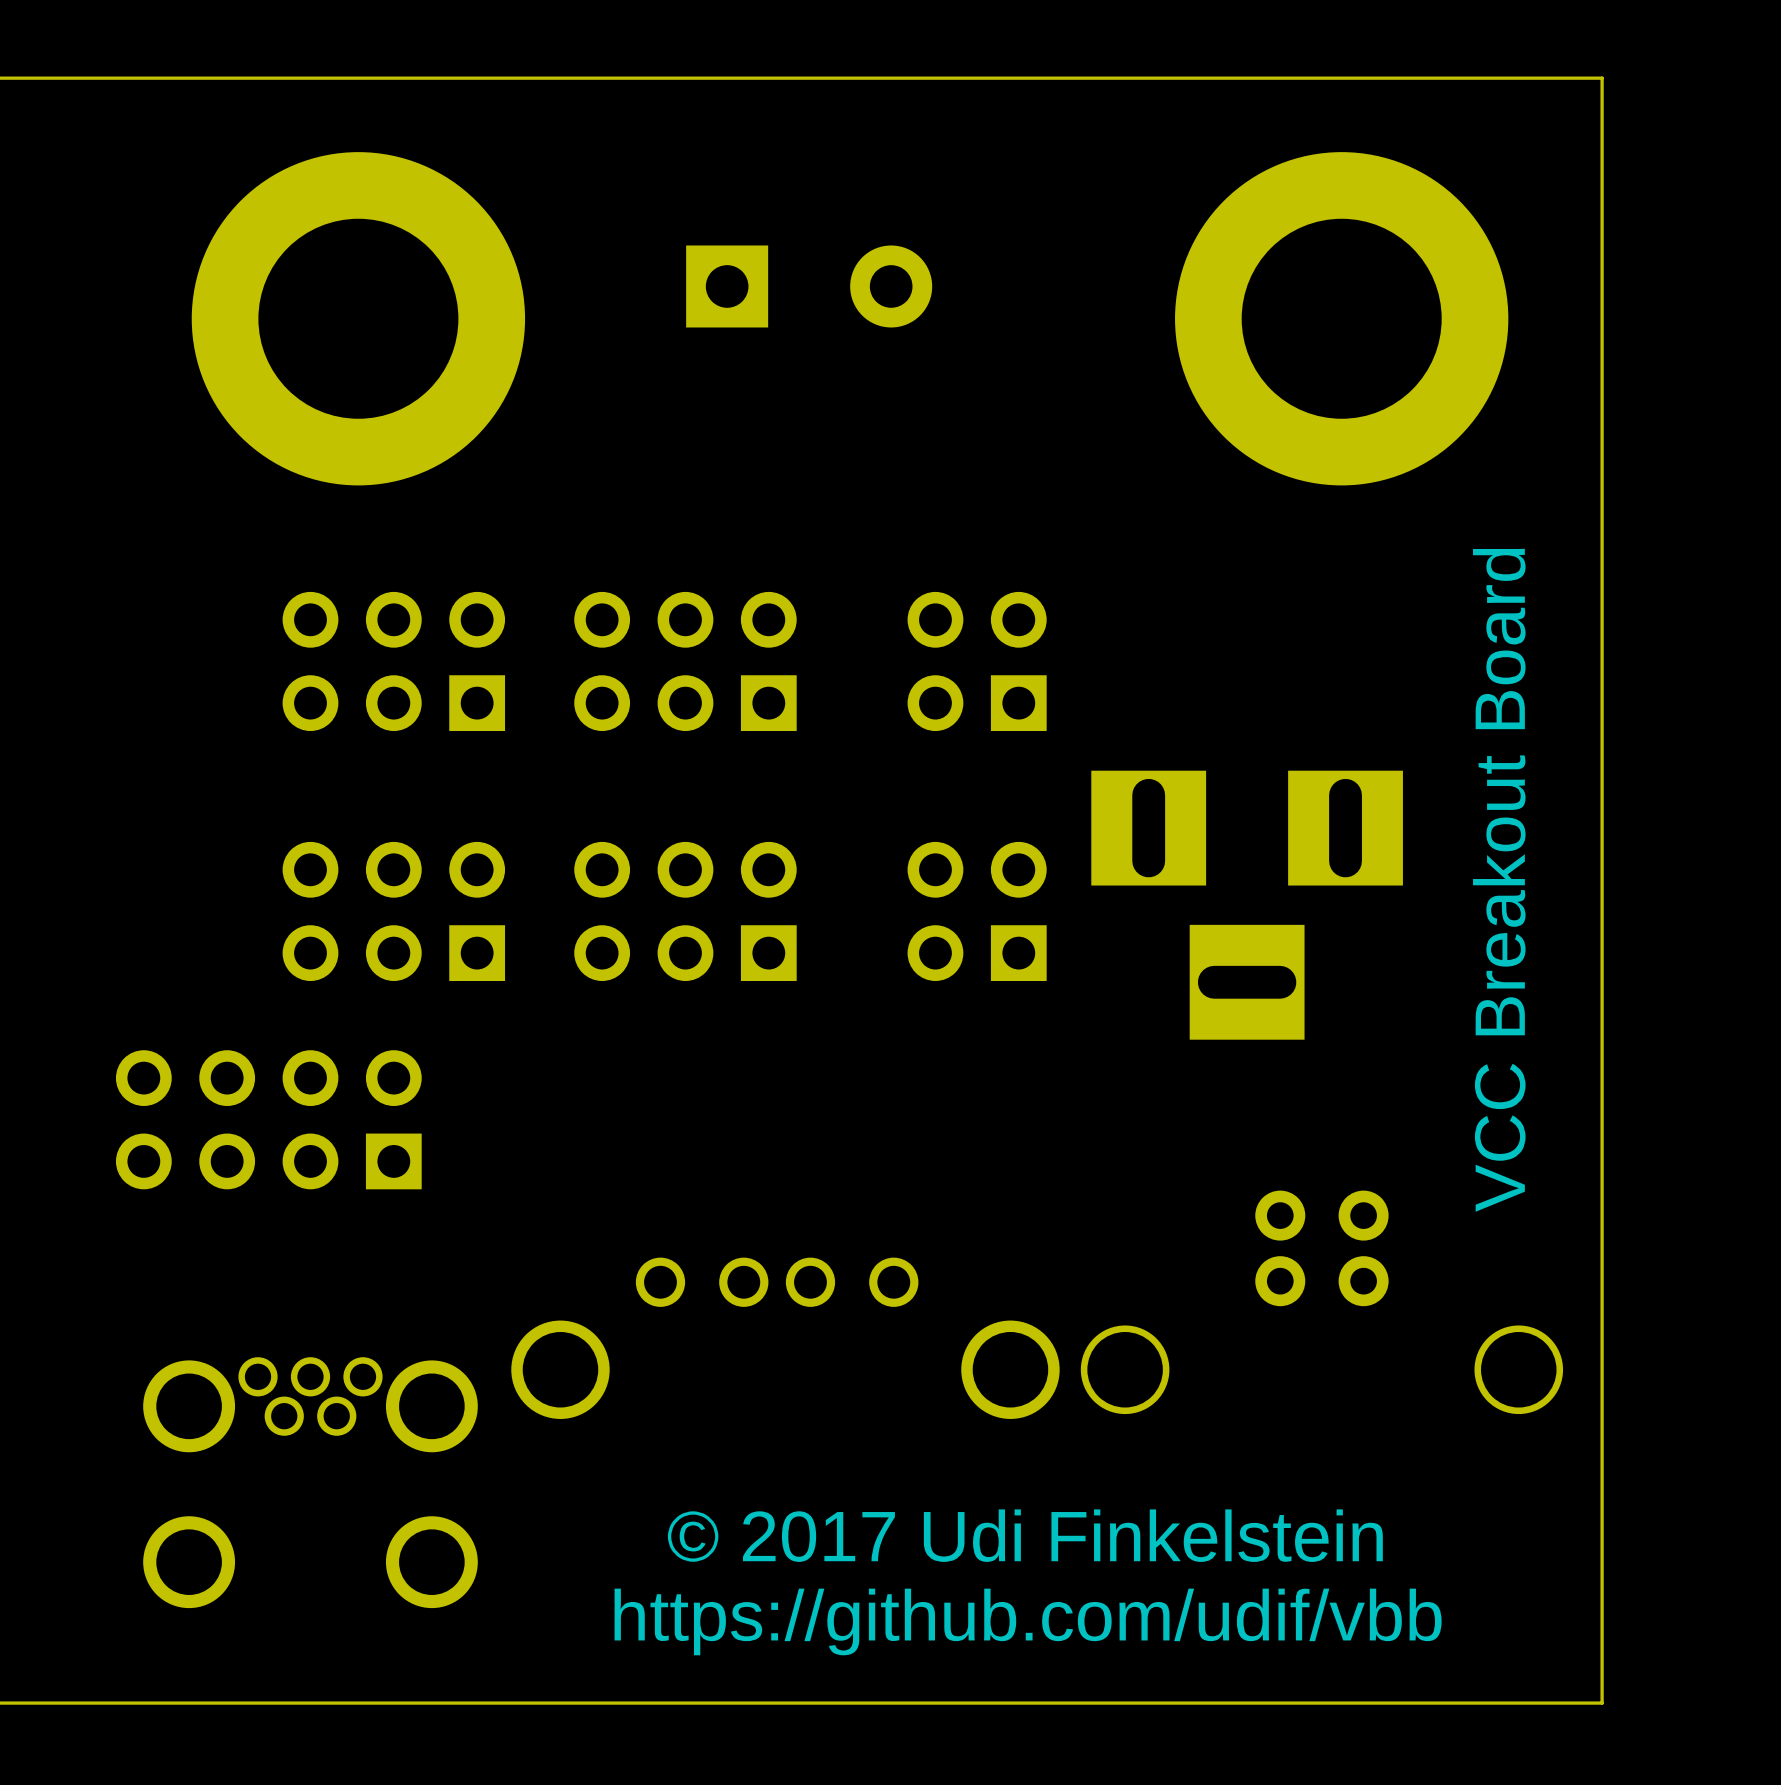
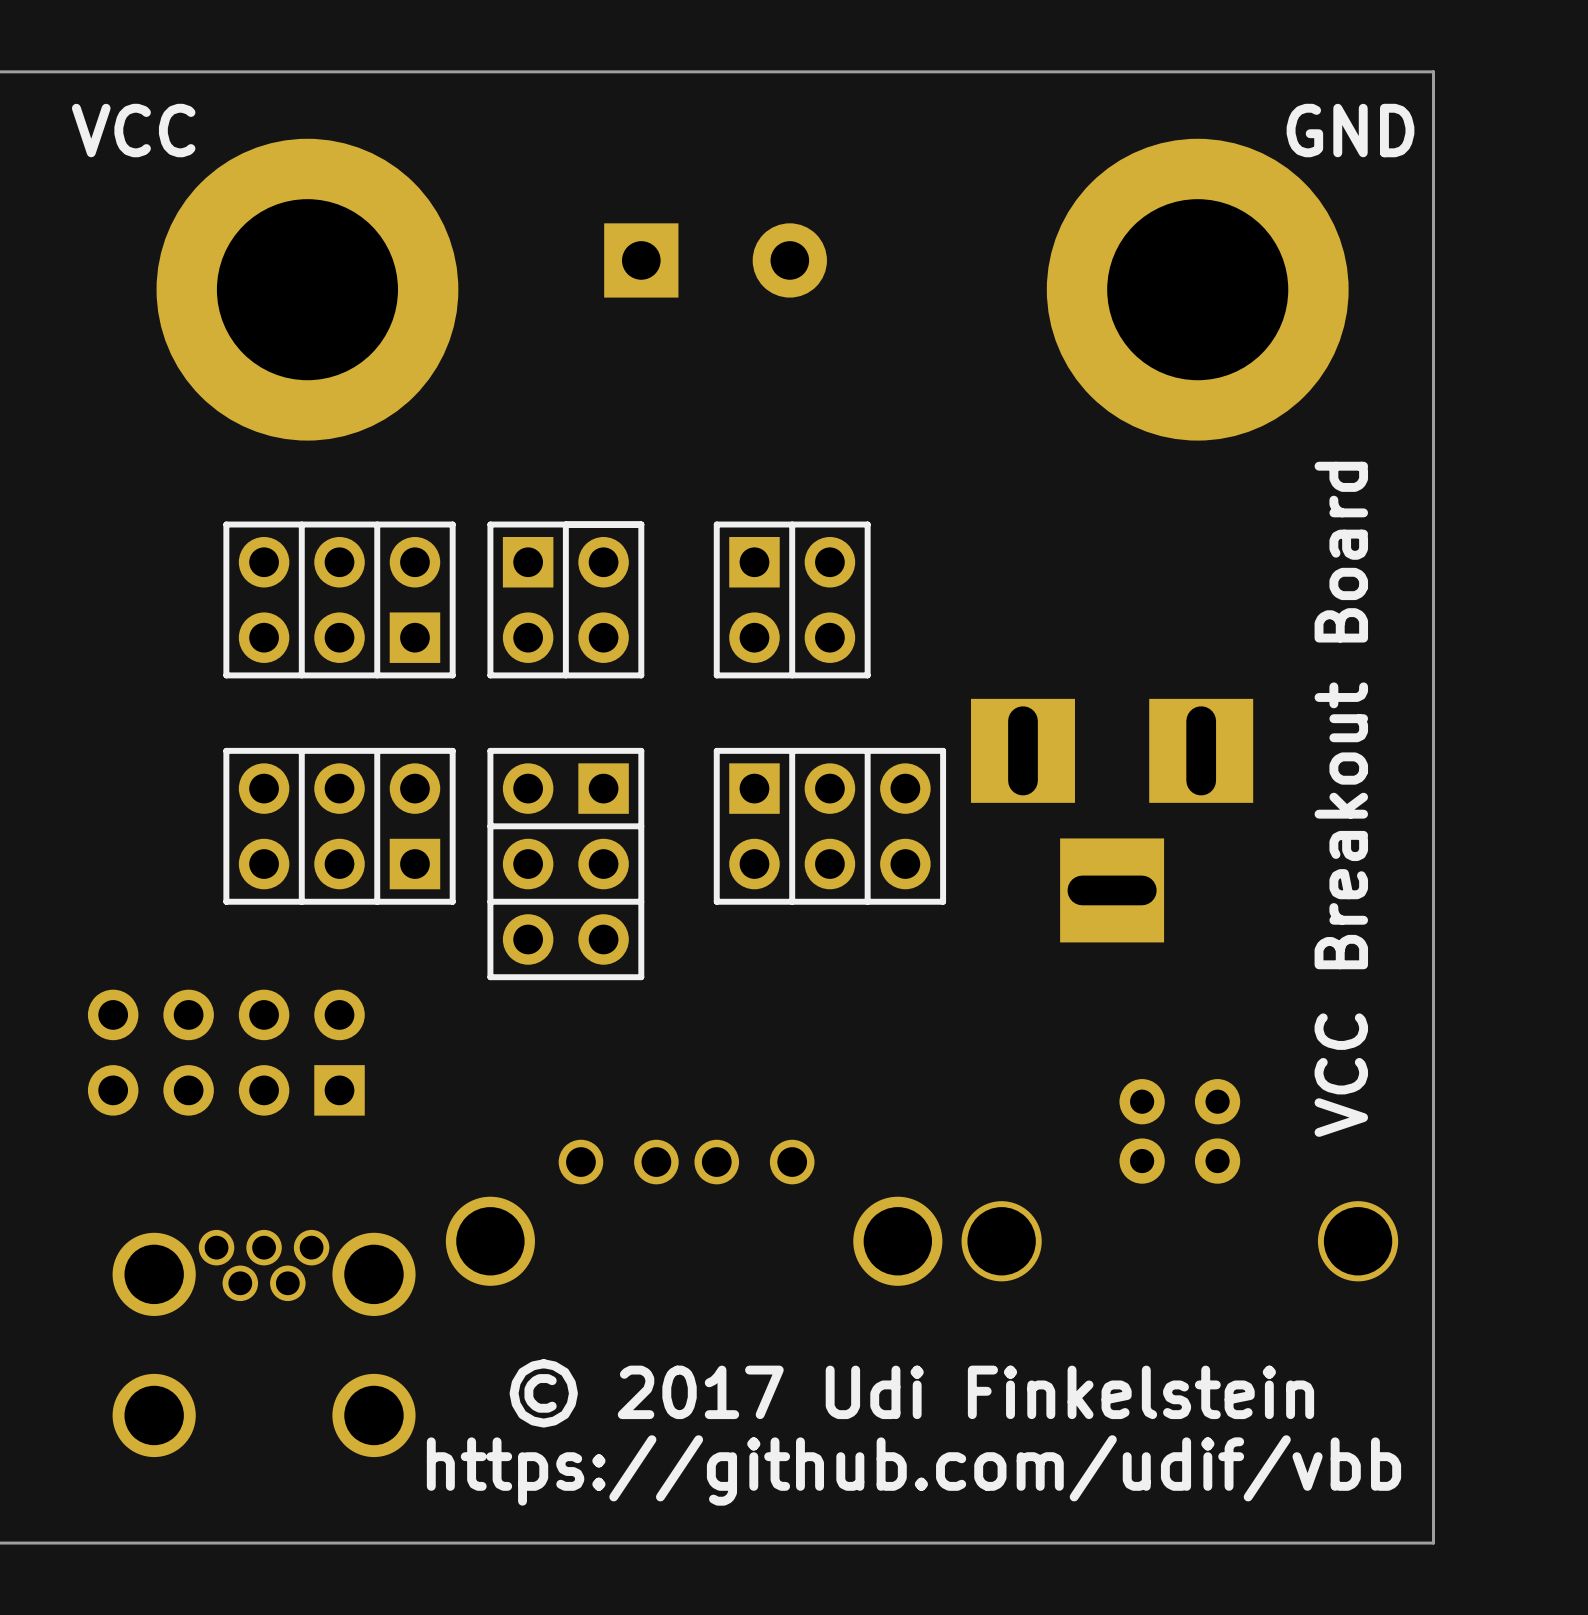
text: none -> VCC (133, 130)
text: none -> GND (1350, 130)
line: none -> (301, 524) (301, 675)
line: none -> (377, 524) (377, 675)
line: none -> (452, 524) (452, 675) (226, 675) (226, 524) (452, 524)
line: none -> (565, 524) (565, 675)
line: none -> (641, 524) (490, 524) (490, 675) (641, 675) (641, 524)
line: none -> (792, 524) (792, 675)
line: none -> (867, 524) (716, 524) (716, 675) (867, 675) (867, 524)
part: none -> (565, 599)
part: (685, 661) -> none
part rotation: 0° (977, 661) -> 180° (792, 599)
line: none -> (301, 750) (301, 901)
line: none -> (377, 750) (377, 901)
line: none -> (452, 750) (452, 901) (226, 901) (226, 750) (452, 750)
line: none -> (641, 750) (490, 750) (490, 977) (641, 977) (641, 750)
line: none -> (792, 750) (792, 901)
line: none -> (867, 750) (867, 901)
line: none -> (943, 750) (716, 750) (716, 901) (943, 901) (943, 750)
part rotation: 0° (685, 911) -> 90° counterclockwise (565, 864)
line: none -> (641, 826) (490, 826)
part: none -> (829, 826)
part: (977, 911) -> none
line: none -> (641, 901) (490, 901)
part position: (268, 1119) -> (226, 1052)

